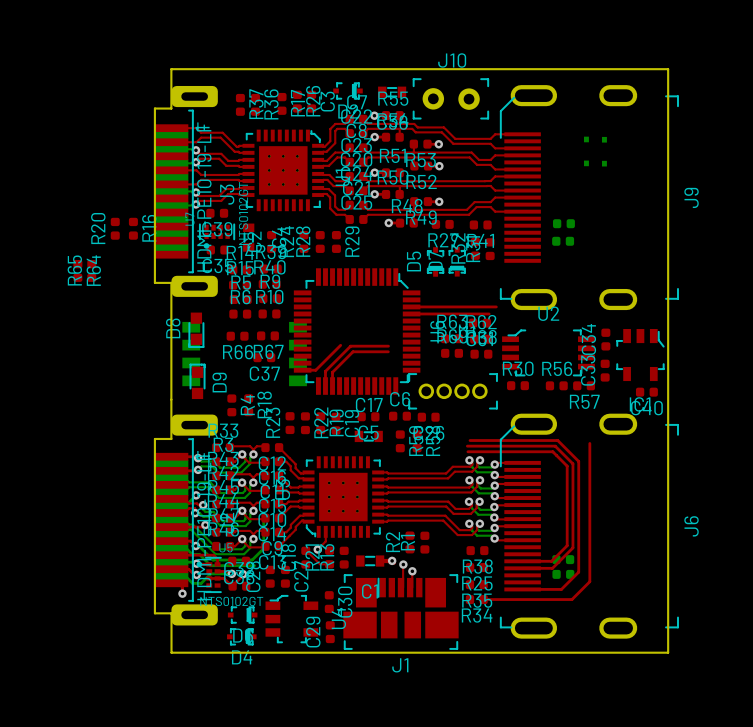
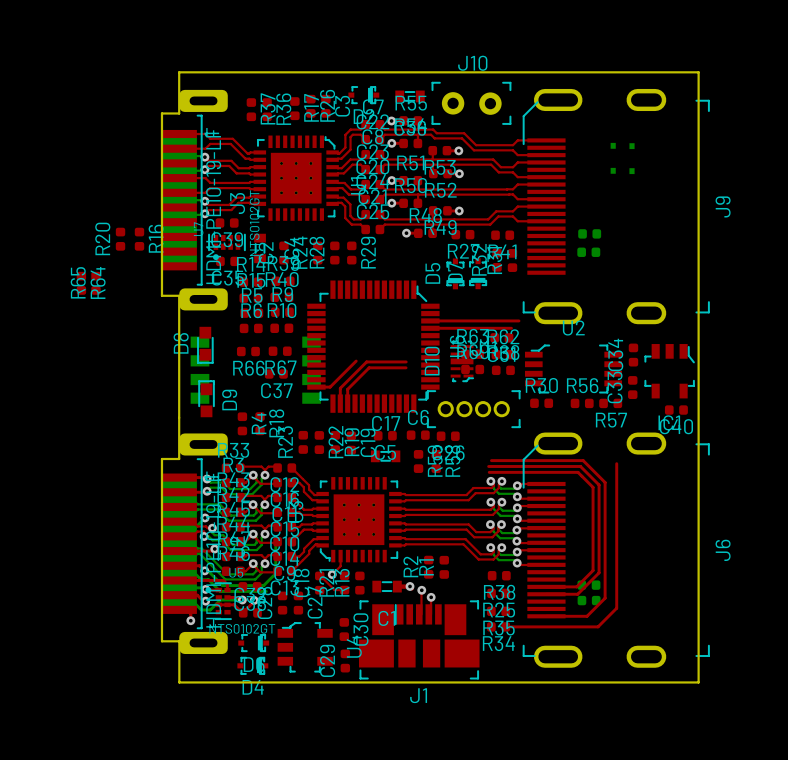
D10: none -> (462, 361)

